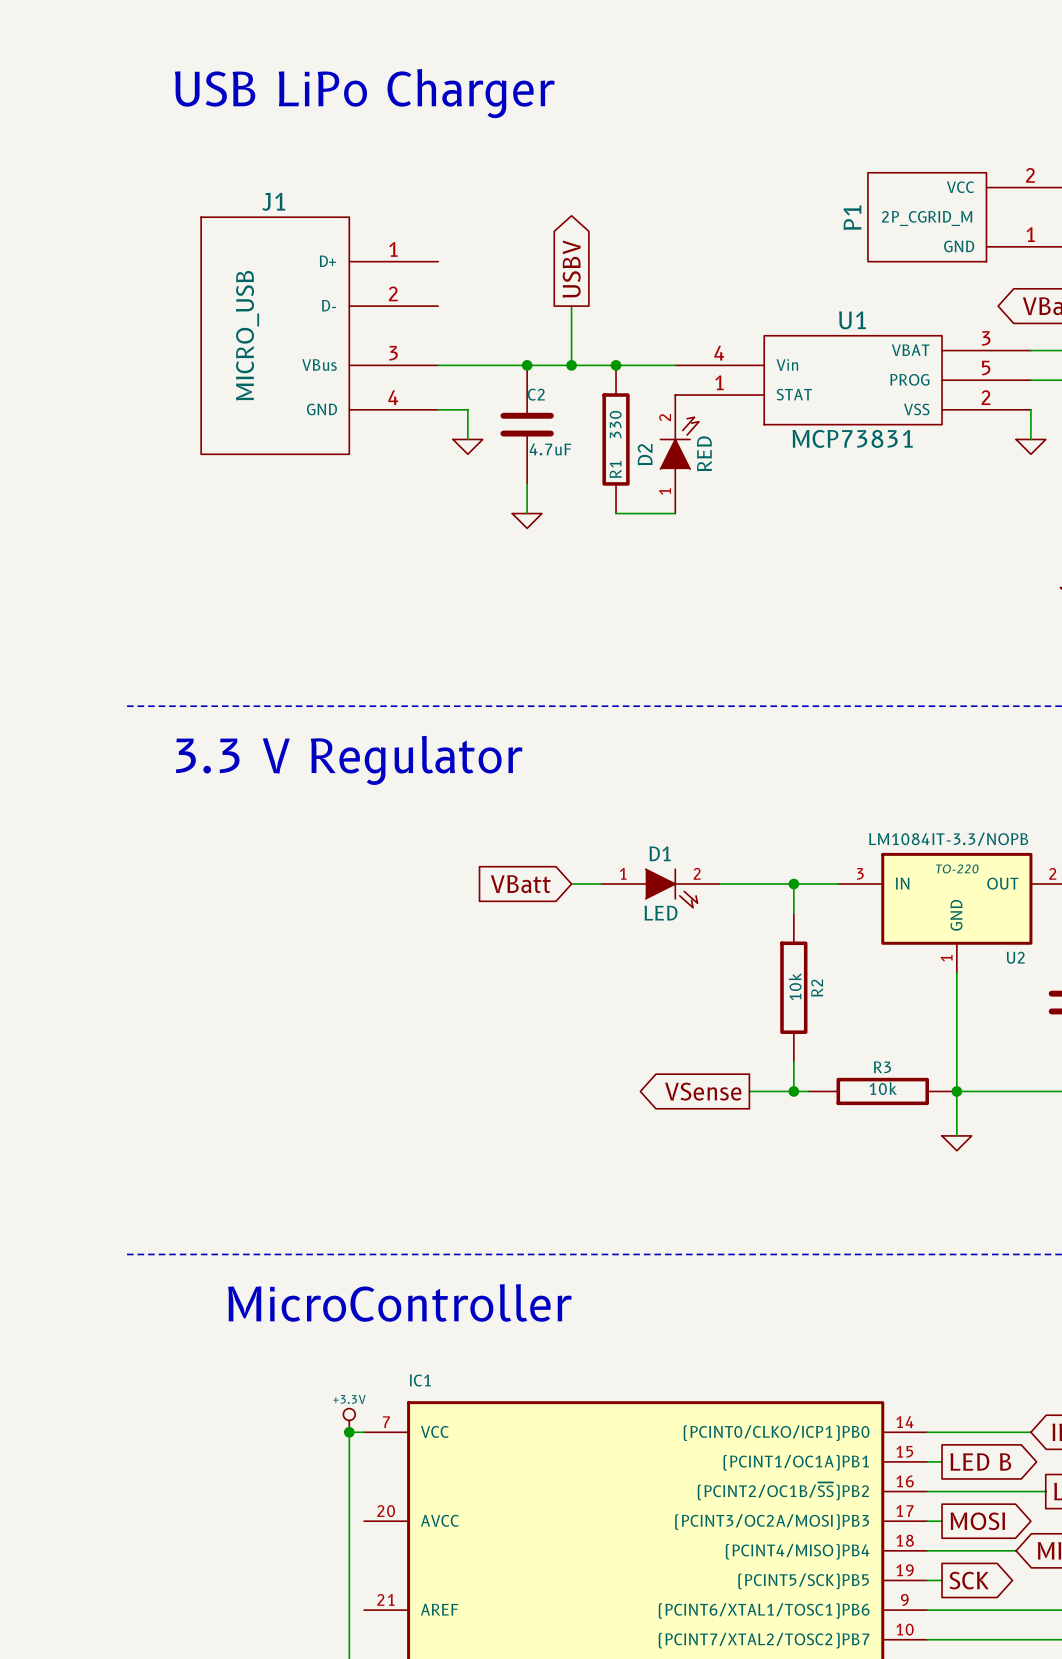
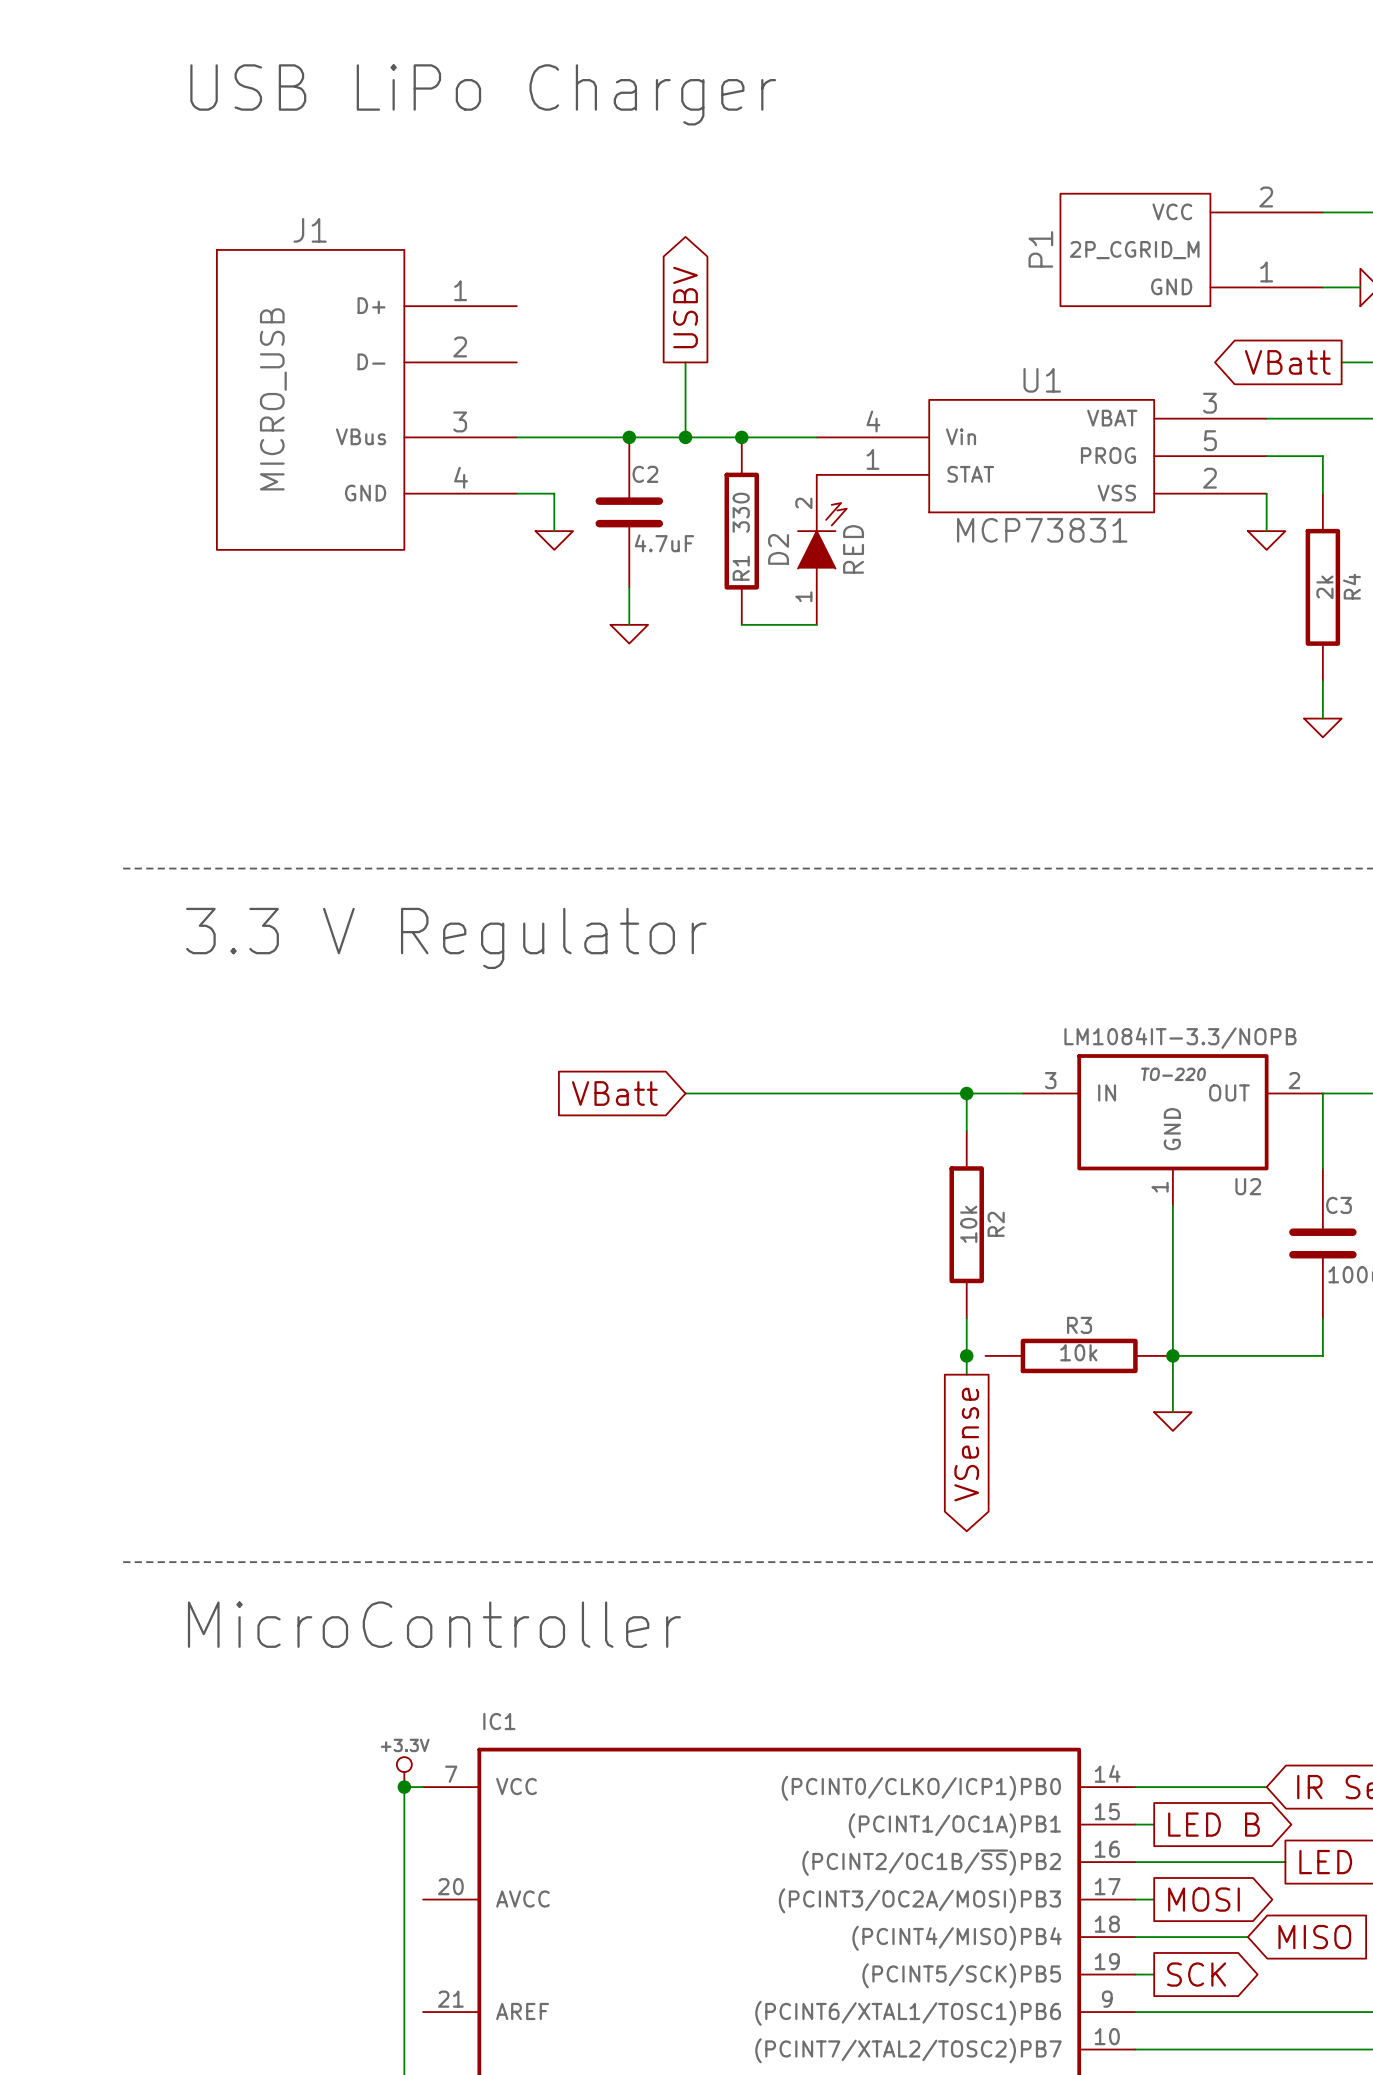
D1: LED (660, 888) -> none
global label rotation: 0° (703, 1091) -> 90° counterclockwise (966, 1444)
global label position: VSense (703, 1091) -> VSense (966, 1444)
wire: (749, 1091) (808, 1091) -> none
wire: none -> (966, 1355) (966, 1374)

